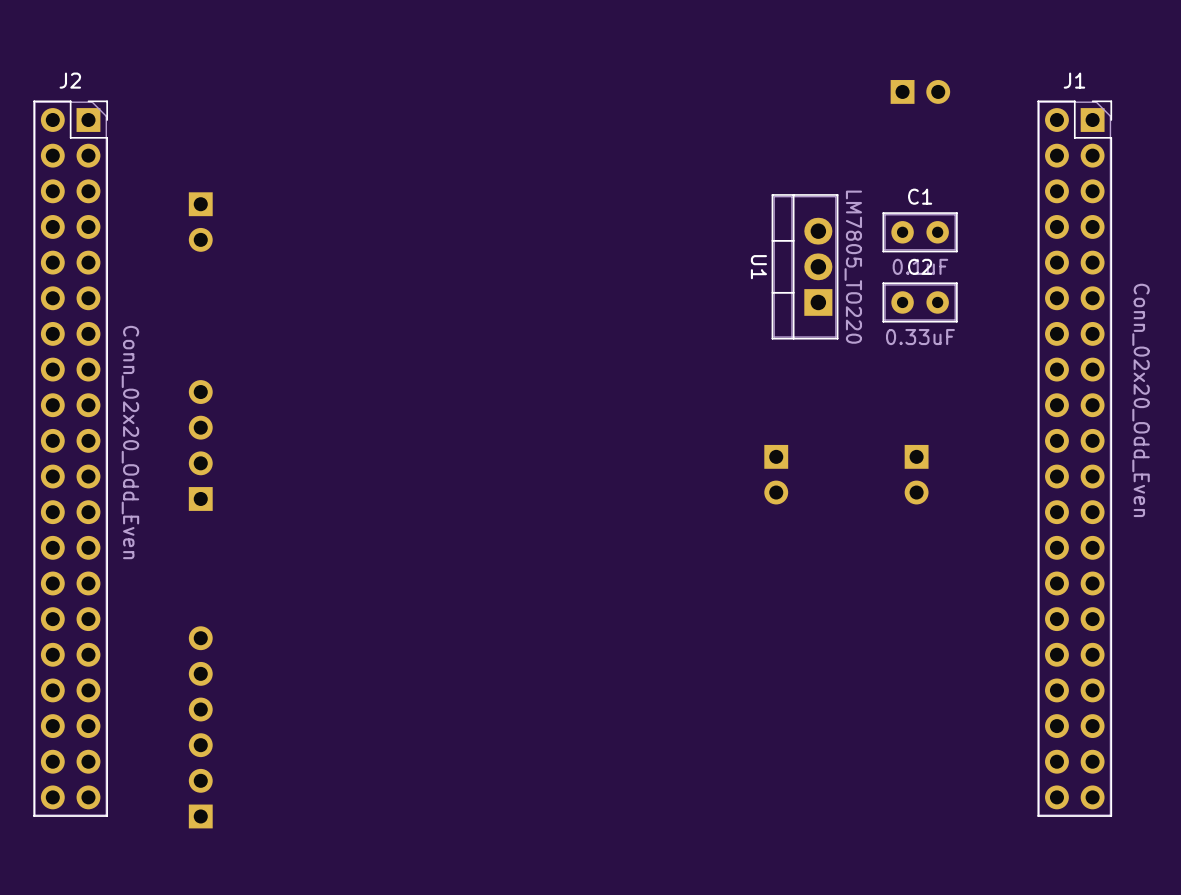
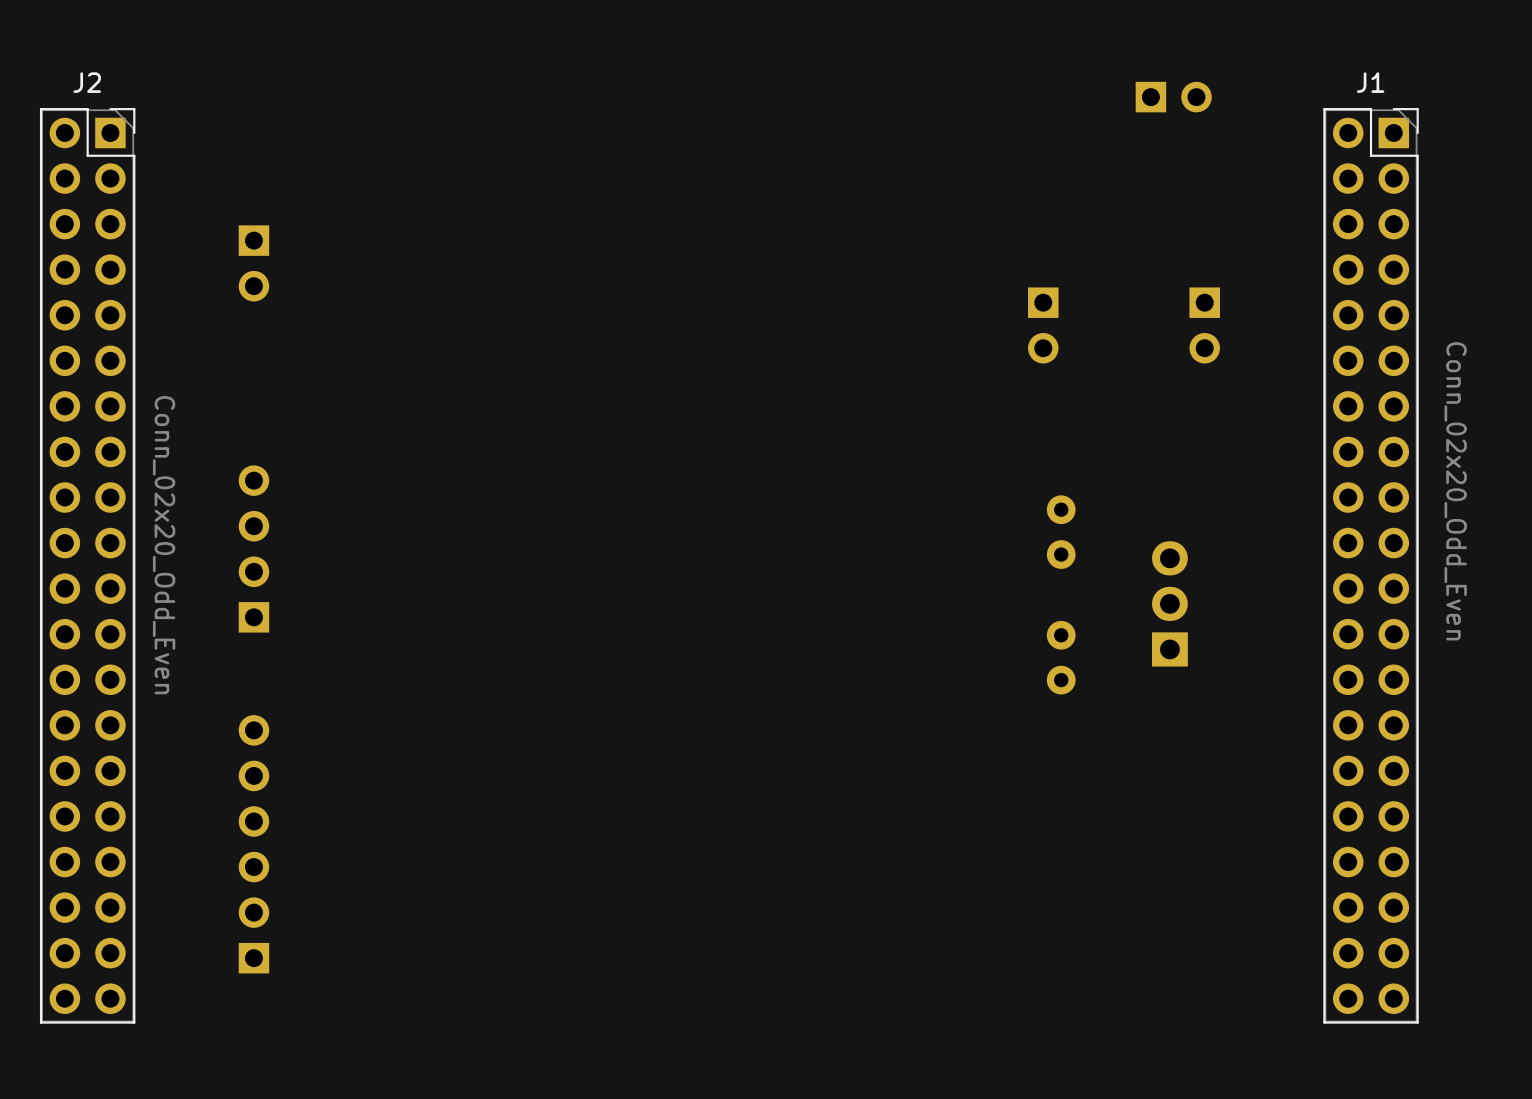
C1 side: bottom (920, 232) -> top (1061, 532)
U1: LM7805_TO220 (805, 266) -> none
part: none -> (1043, 325)
part: none -> (1204, 325)
C2 side: bottom (920, 302) -> top (1061, 657)
part footprint: [904, 444, 929, 505] -> [1151, 541, 1188, 667]
part: (776, 474) -> none
part position: (200, 727) -> (253, 844)

